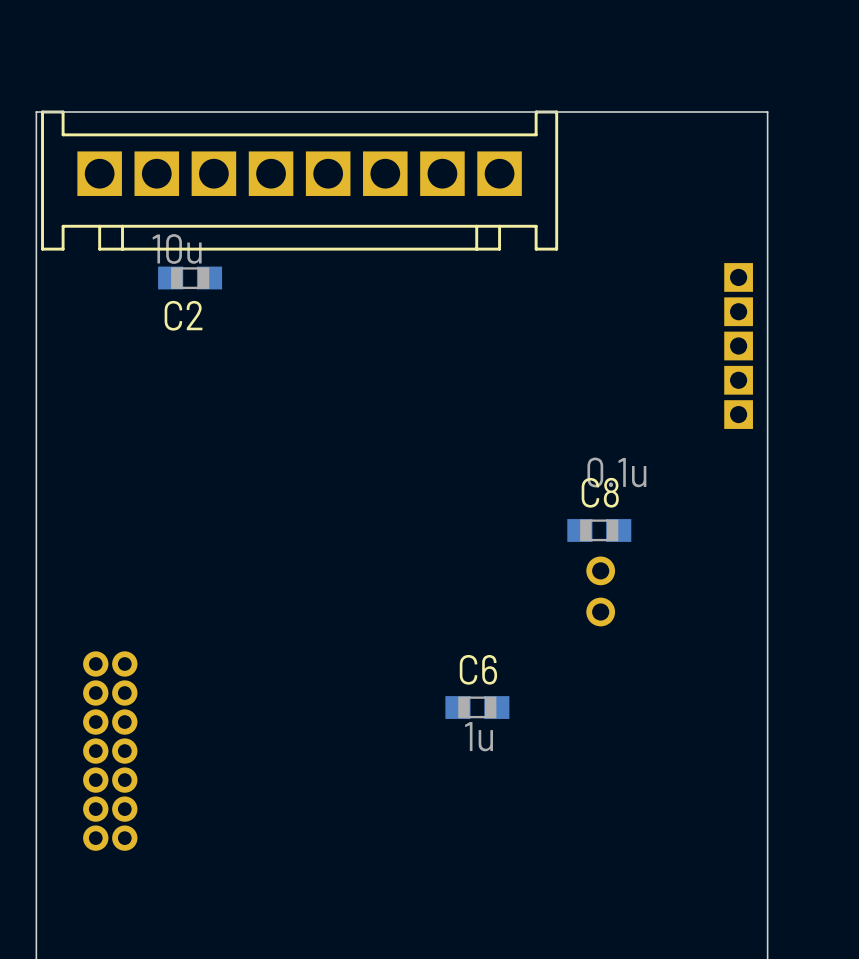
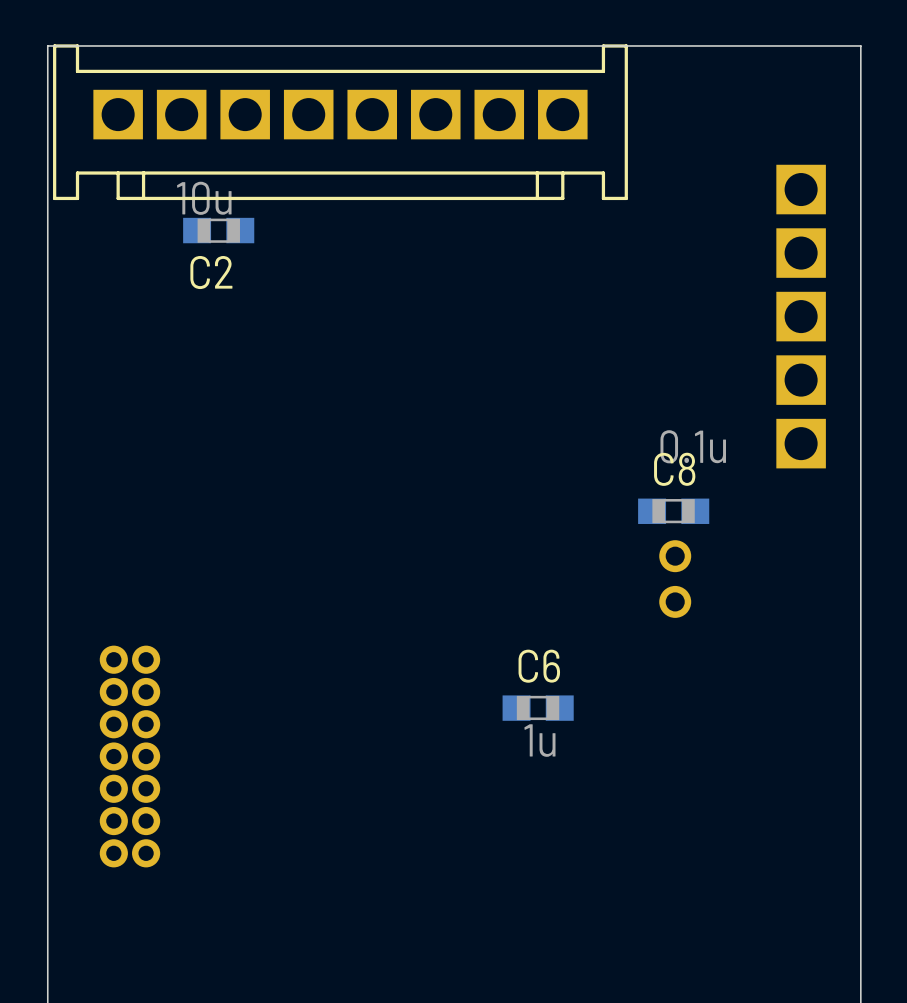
part: (738, 346) -> none
part: none -> (801, 316)

